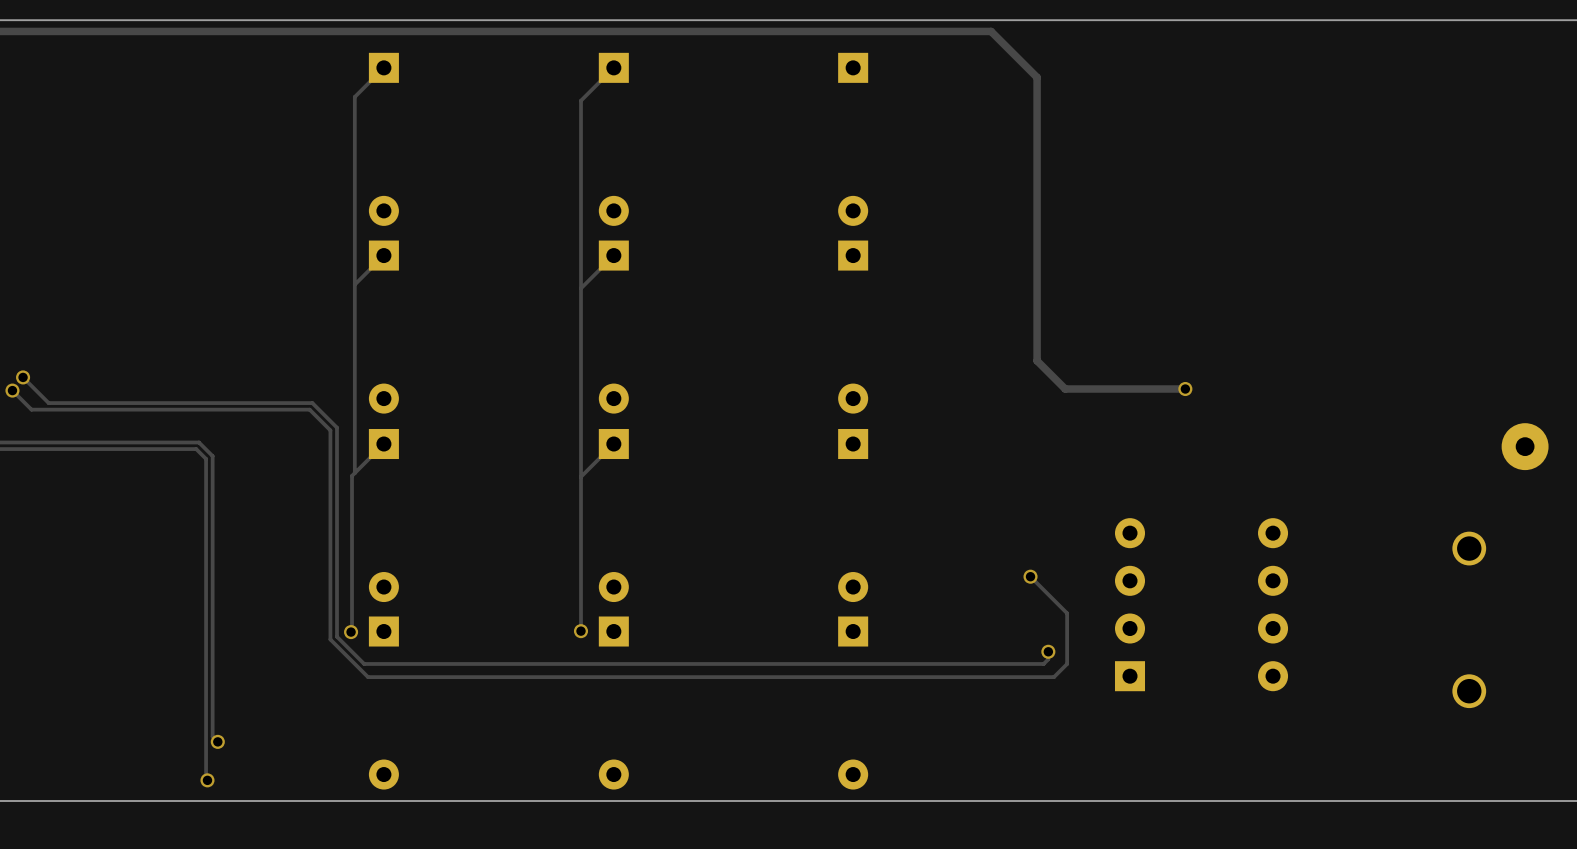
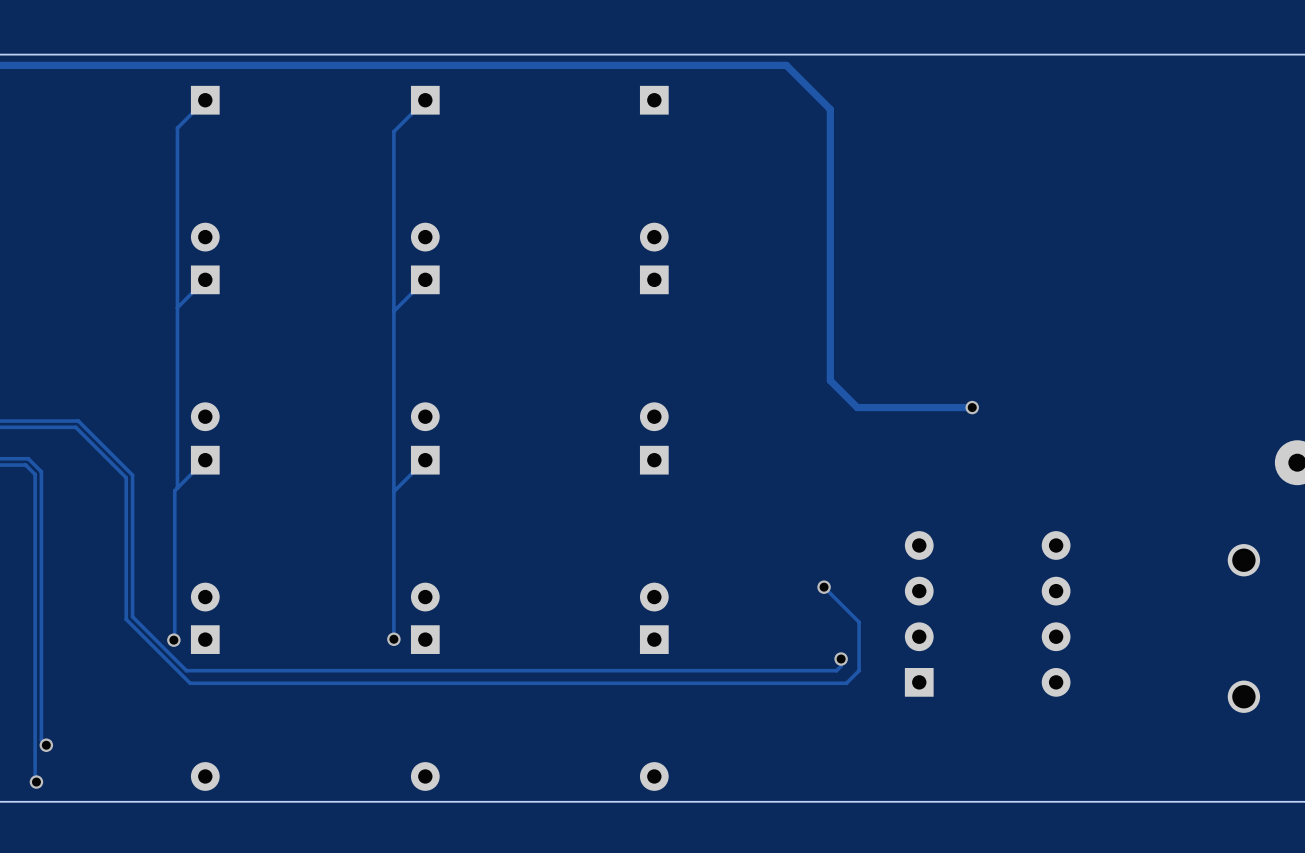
track: (251, 403) (312, 403) (336, 427) (336, 636) -> (78, 421) (132, 475) (132, 616) (160, 644)
track: (248, 409) (309, 409) (330, 430) (330, 639) -> (75, 427) (126, 477) (126, 619) (154, 647)

